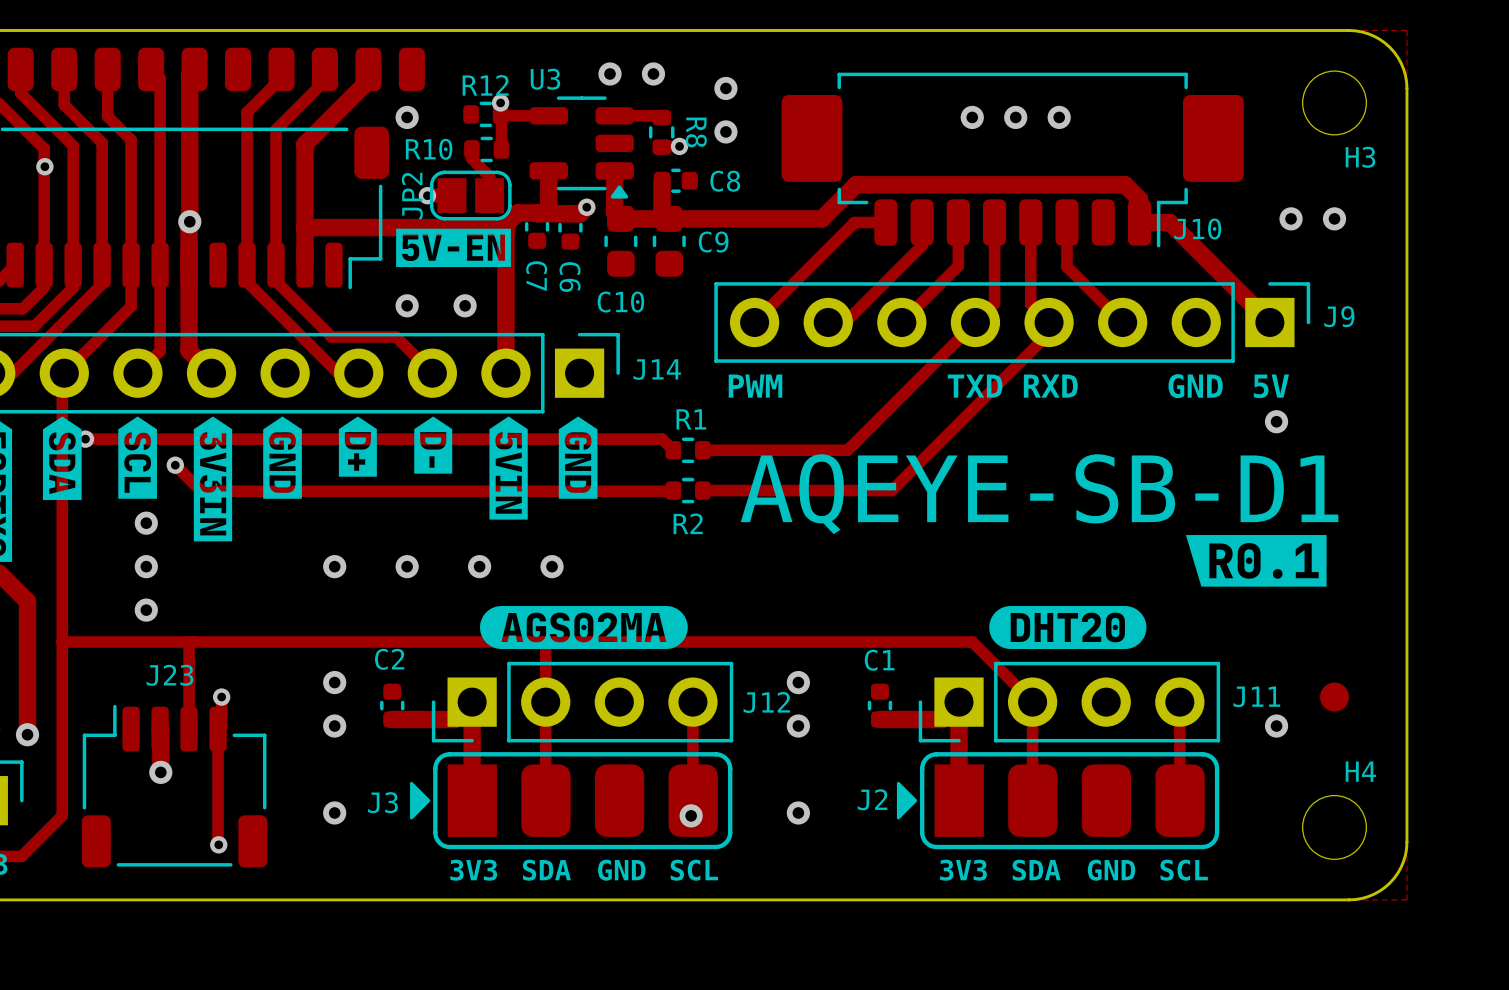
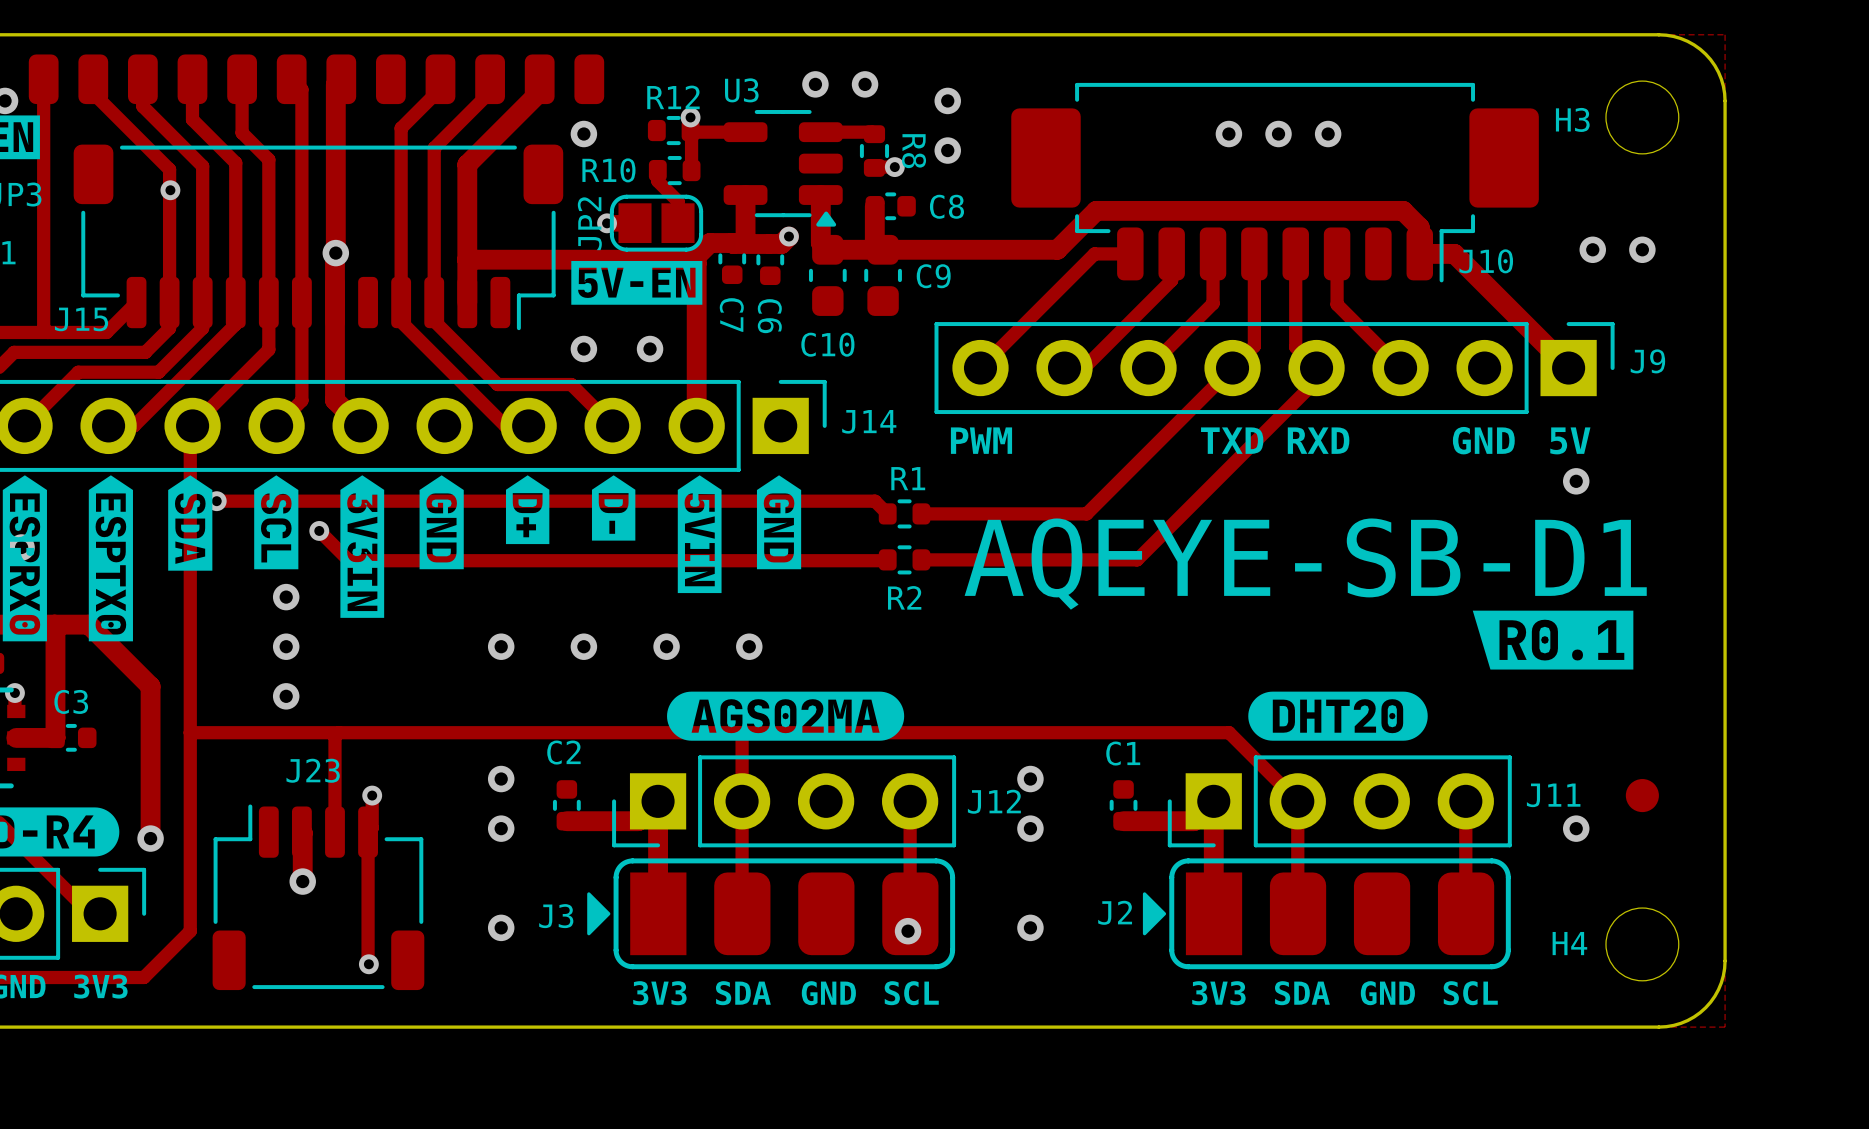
H3 name position: H3 (1360, 157) -> H3 (1572, 119)
H4 name position: H4 (1360, 771) -> H4 (1569, 943)

